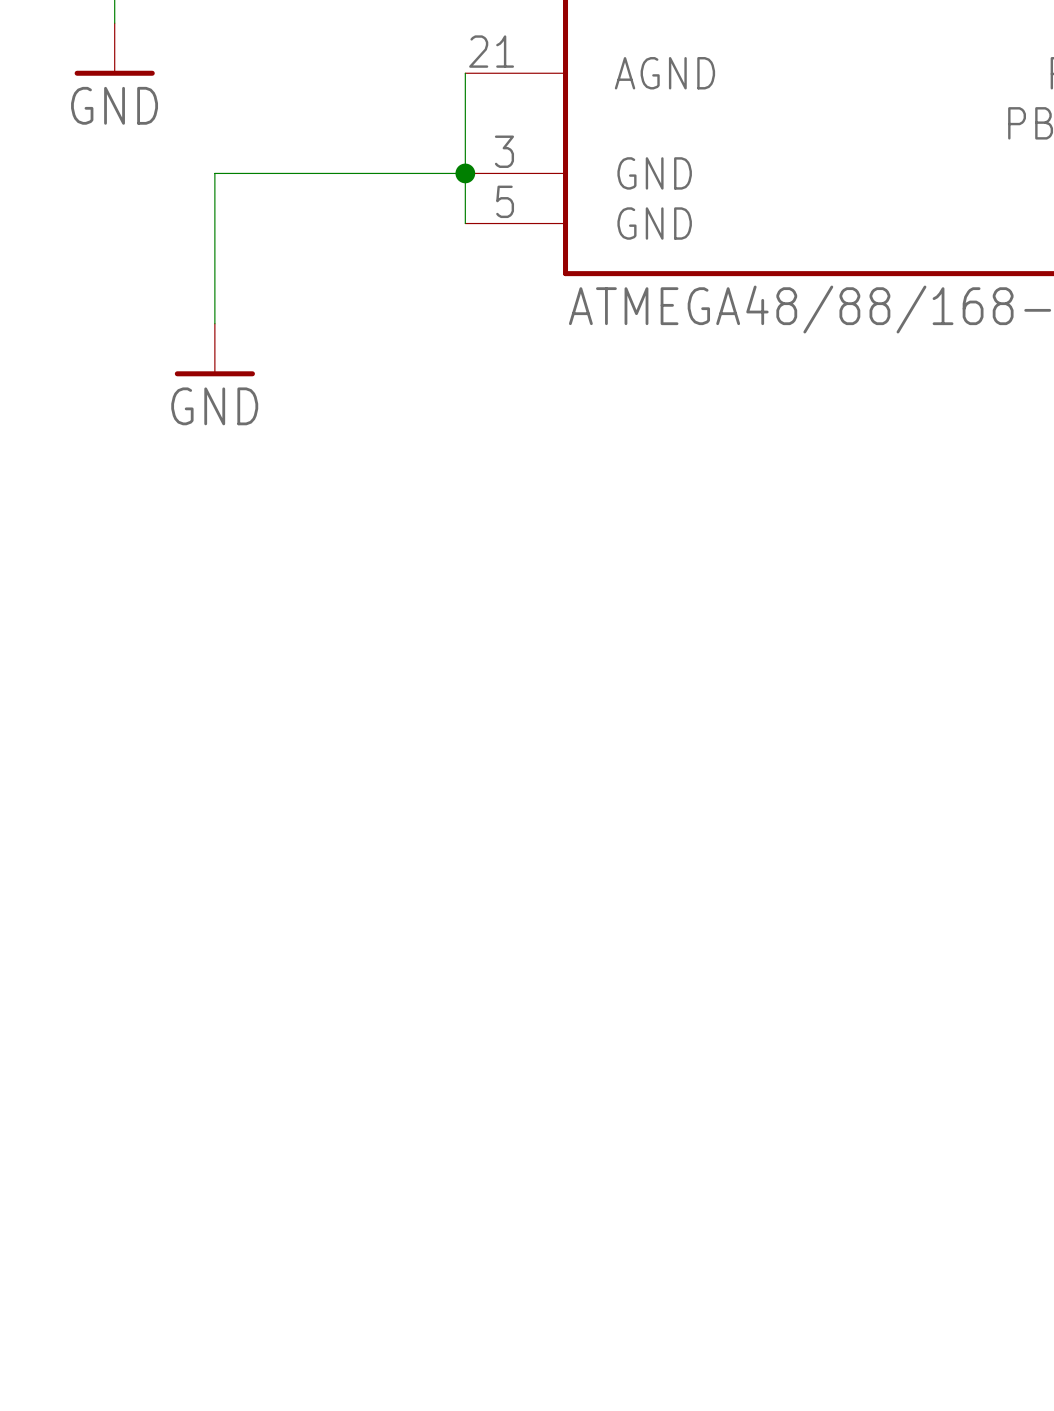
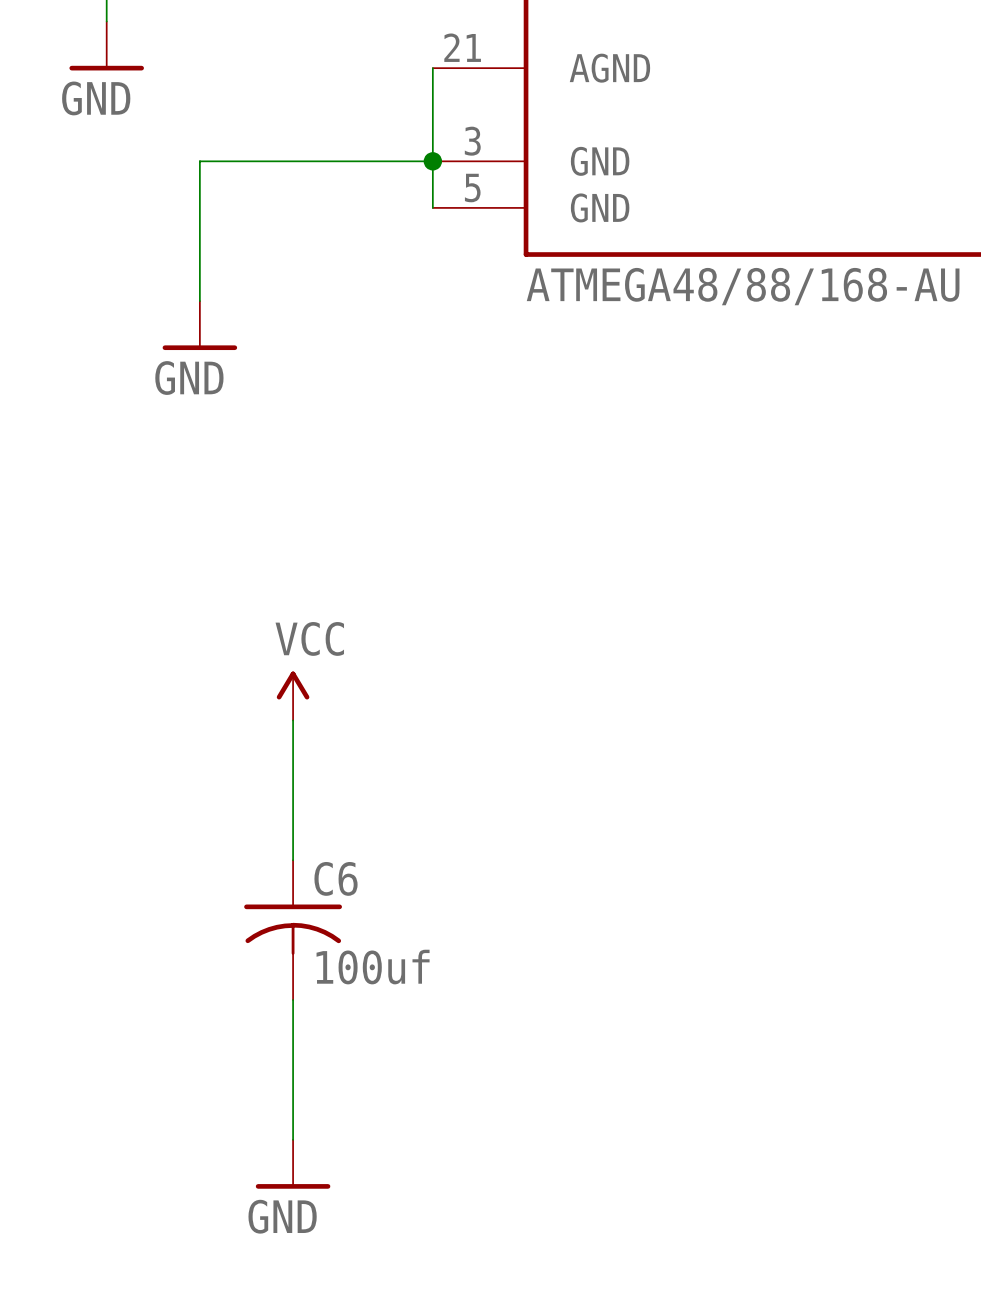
power symbol: none -> VCC (293, 696)
wire: none -> (293, 720) (293, 860)
C6: none -> 100uf (293, 930)
wire: none -> (293, 1000) (293, 1139)
power symbol: none -> GND (293, 1164)

